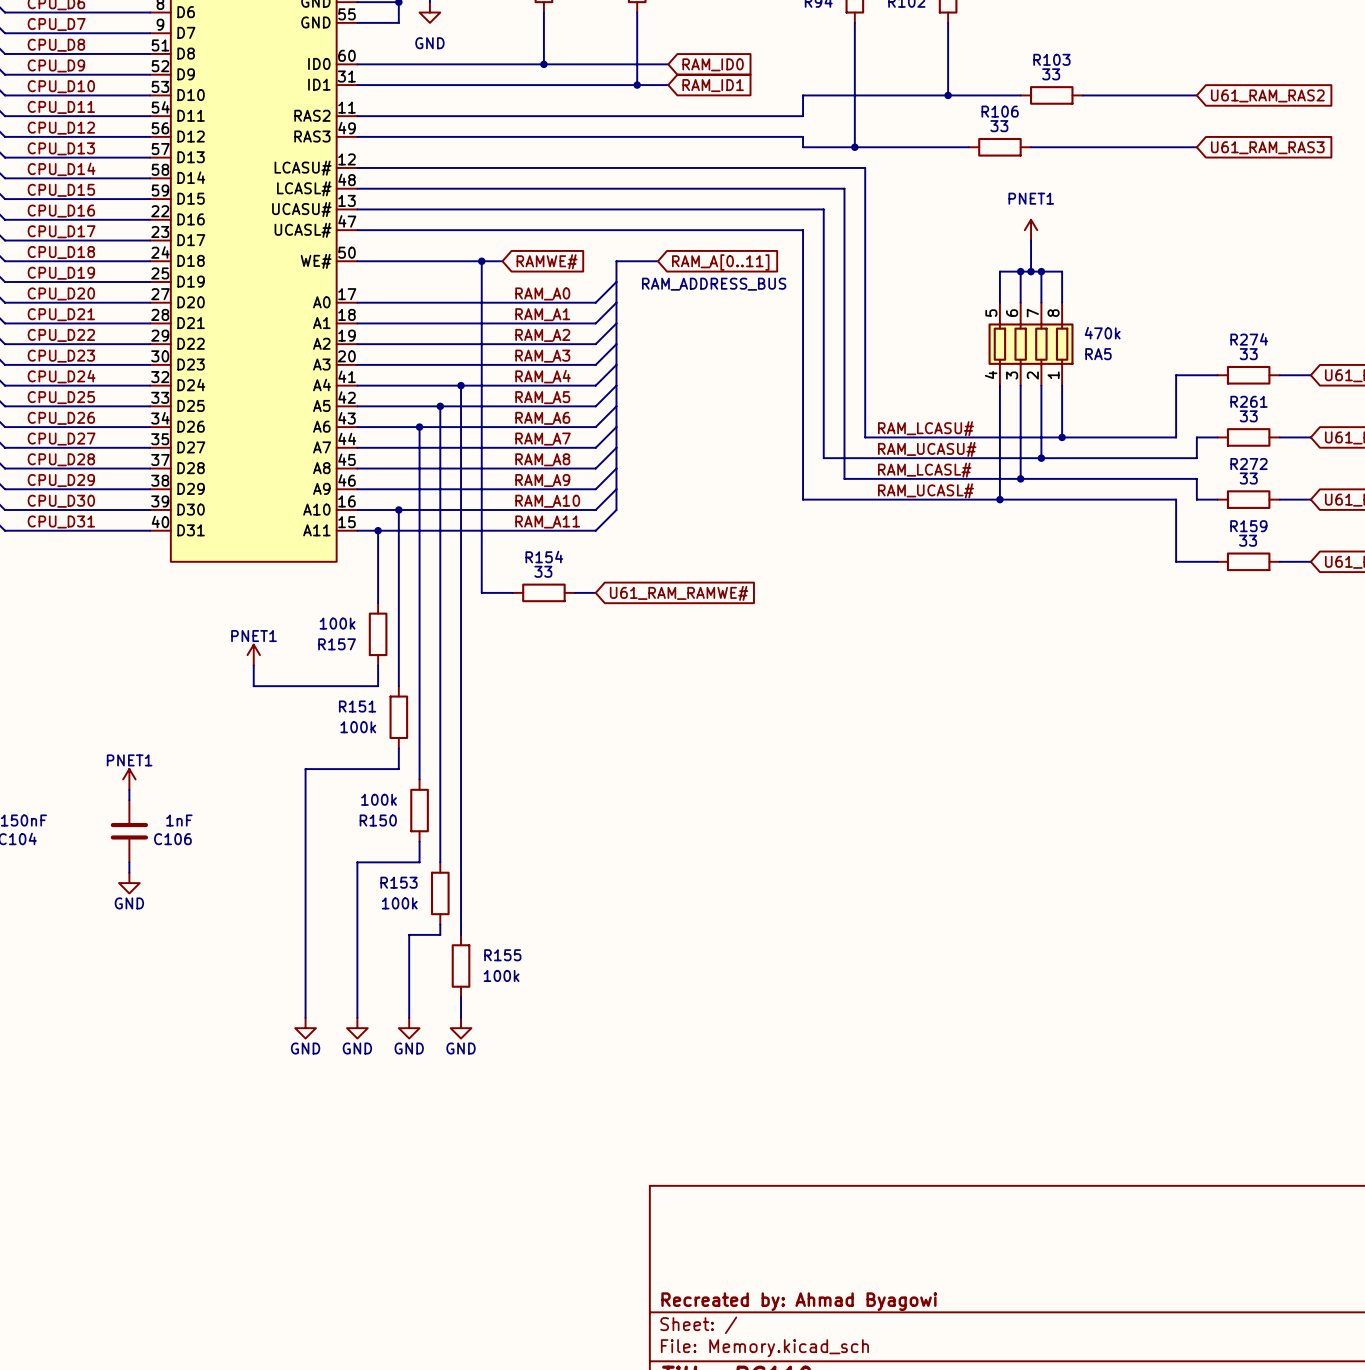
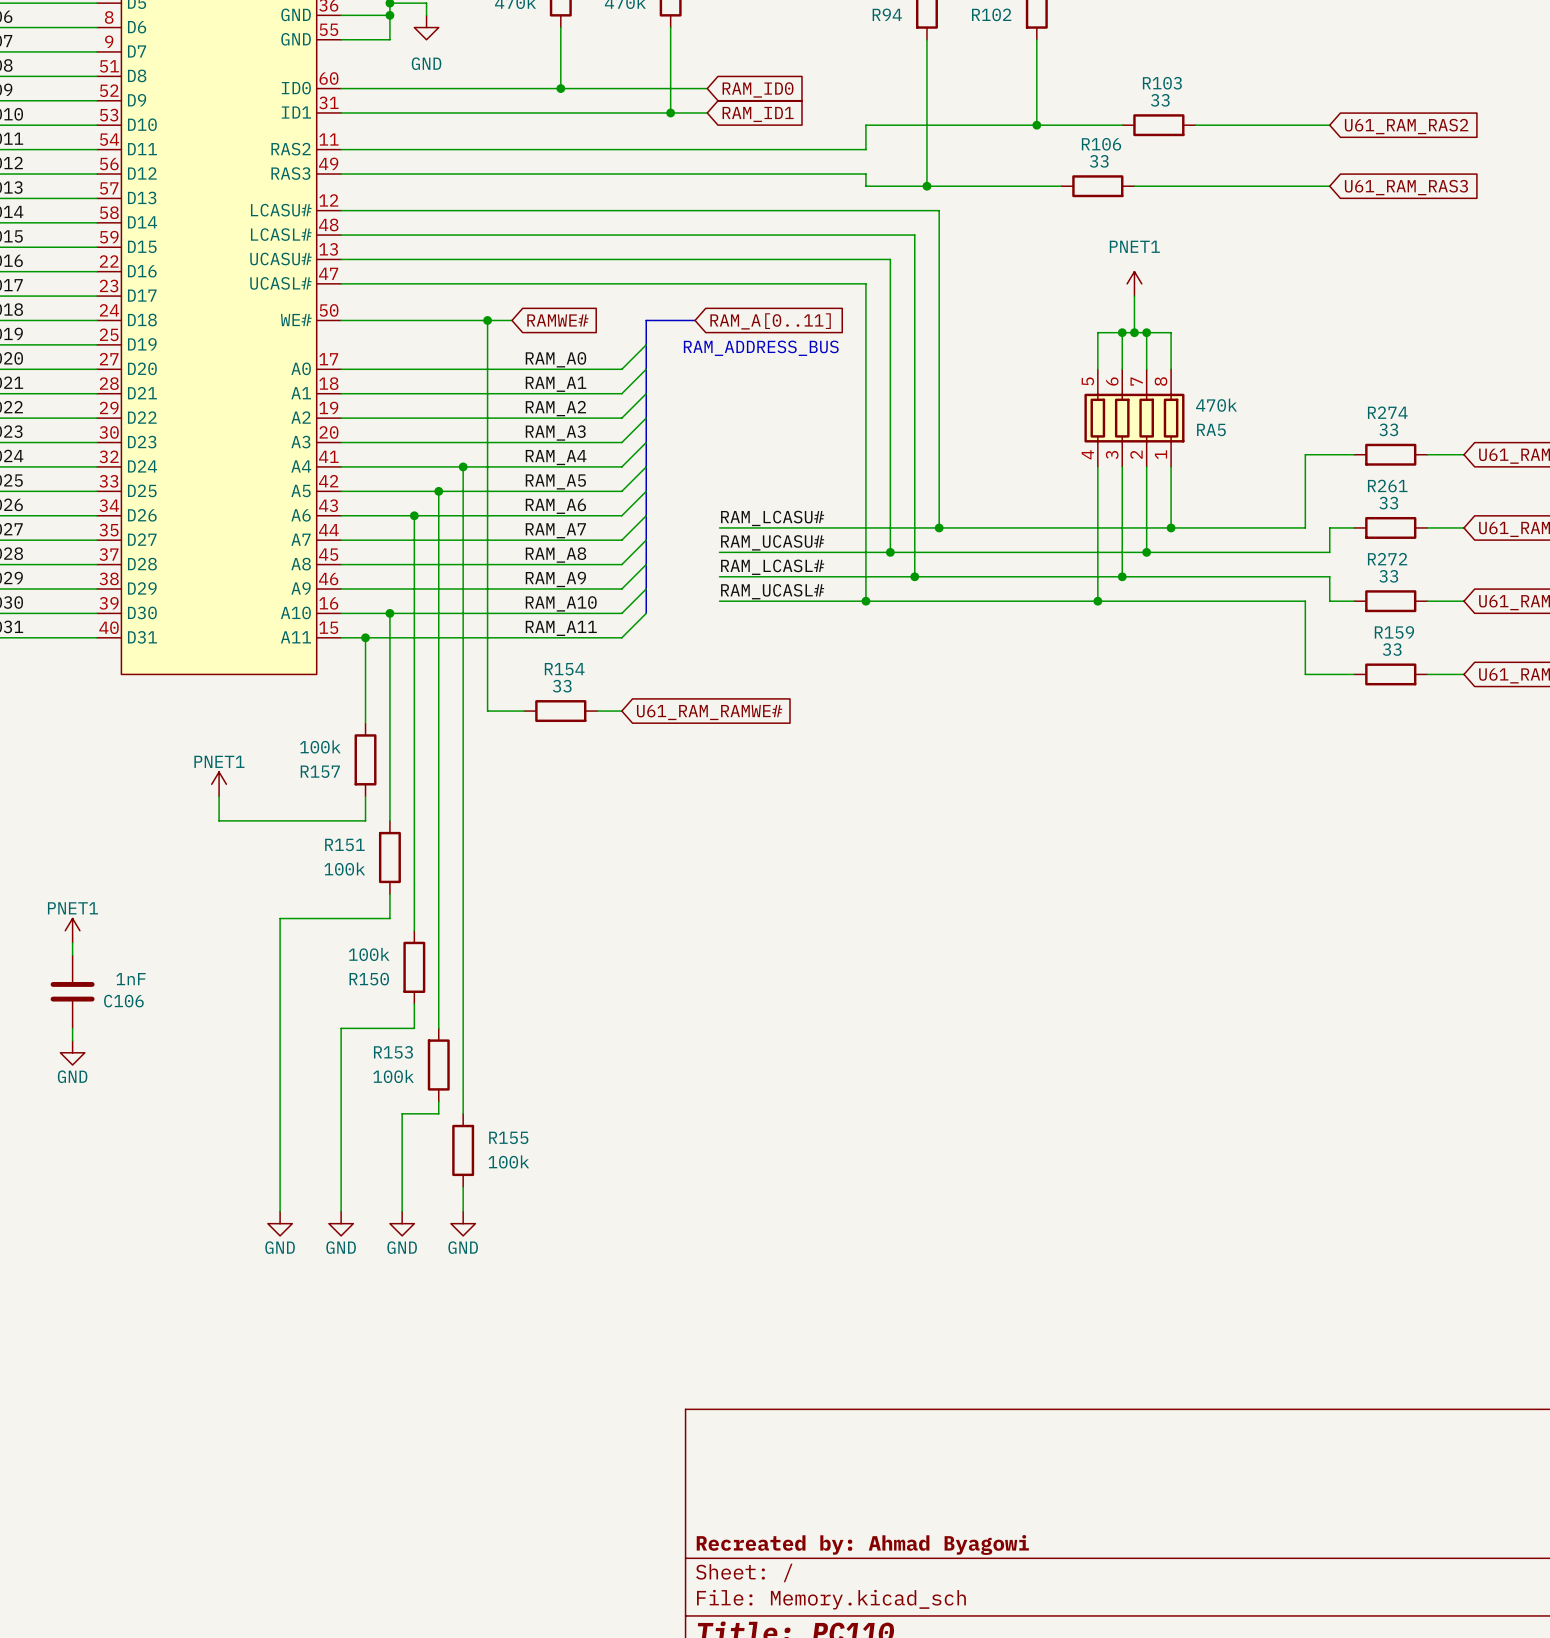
label position: RAM_LCASU# (925, 428) -> RAM_LCASU# (772, 518)
wire: none -> (719, 527) (939, 527)
junction: none -> (939, 527)
label position: RAM_UCASU# (927, 449) -> RAM_UCASU# (772, 542)
wire: none -> (719, 552) (890, 552)
junction: none -> (890, 552)
label position: RAM_LCASL# (924, 470) -> RAM_LCASL# (772, 567)
wire: none -> (719, 576) (914, 576)
junction: none -> (914, 576)
label position: RAM_UCASL# (925, 490) -> RAM_UCASL# (772, 591)
wire: none -> (719, 601) (865, 601)
junction: none -> (865, 601)

